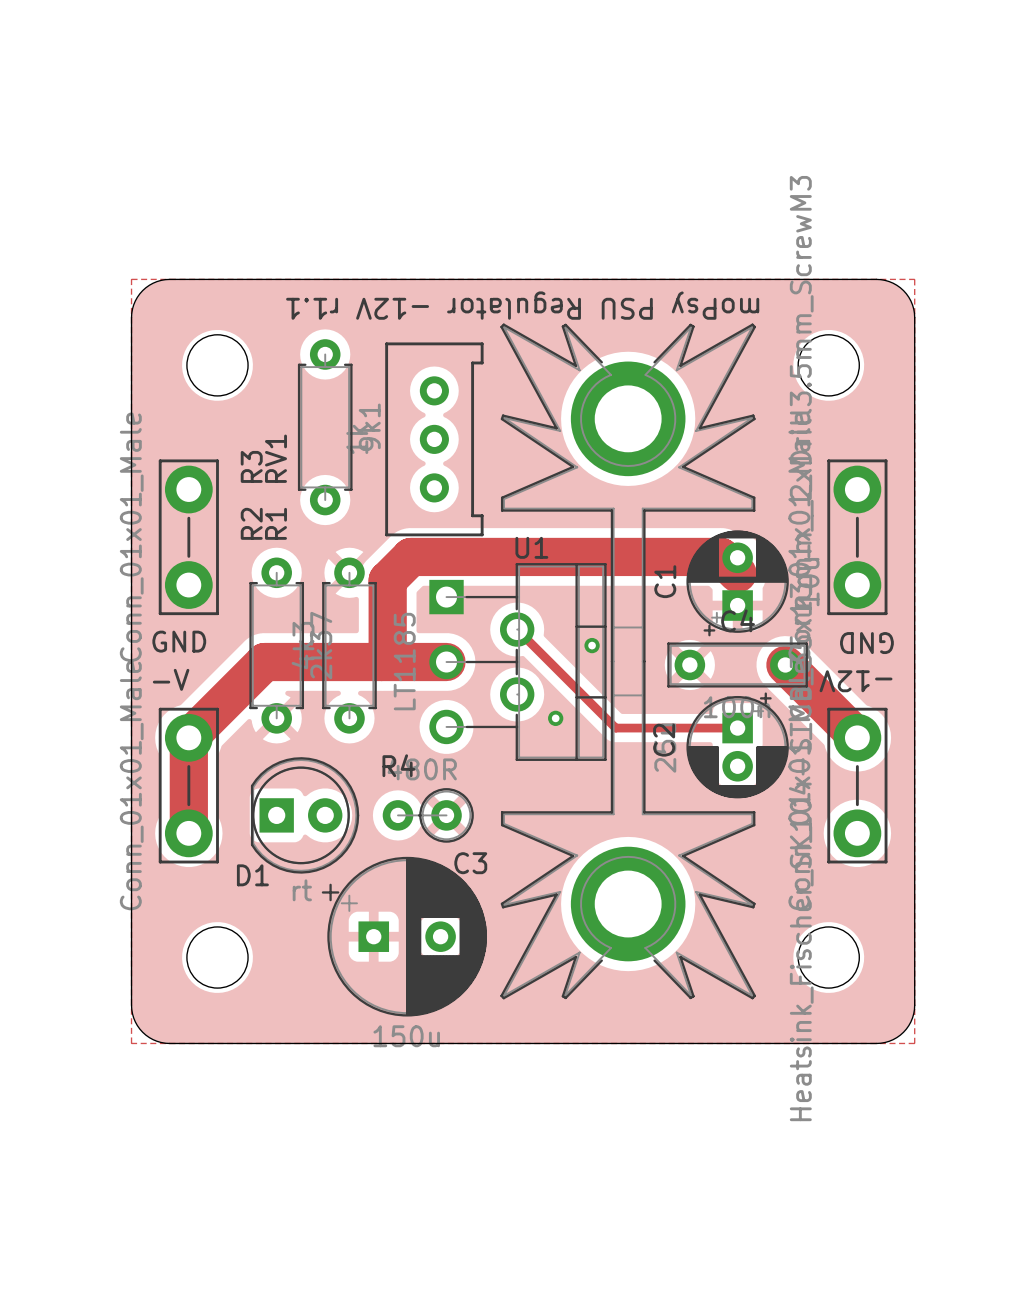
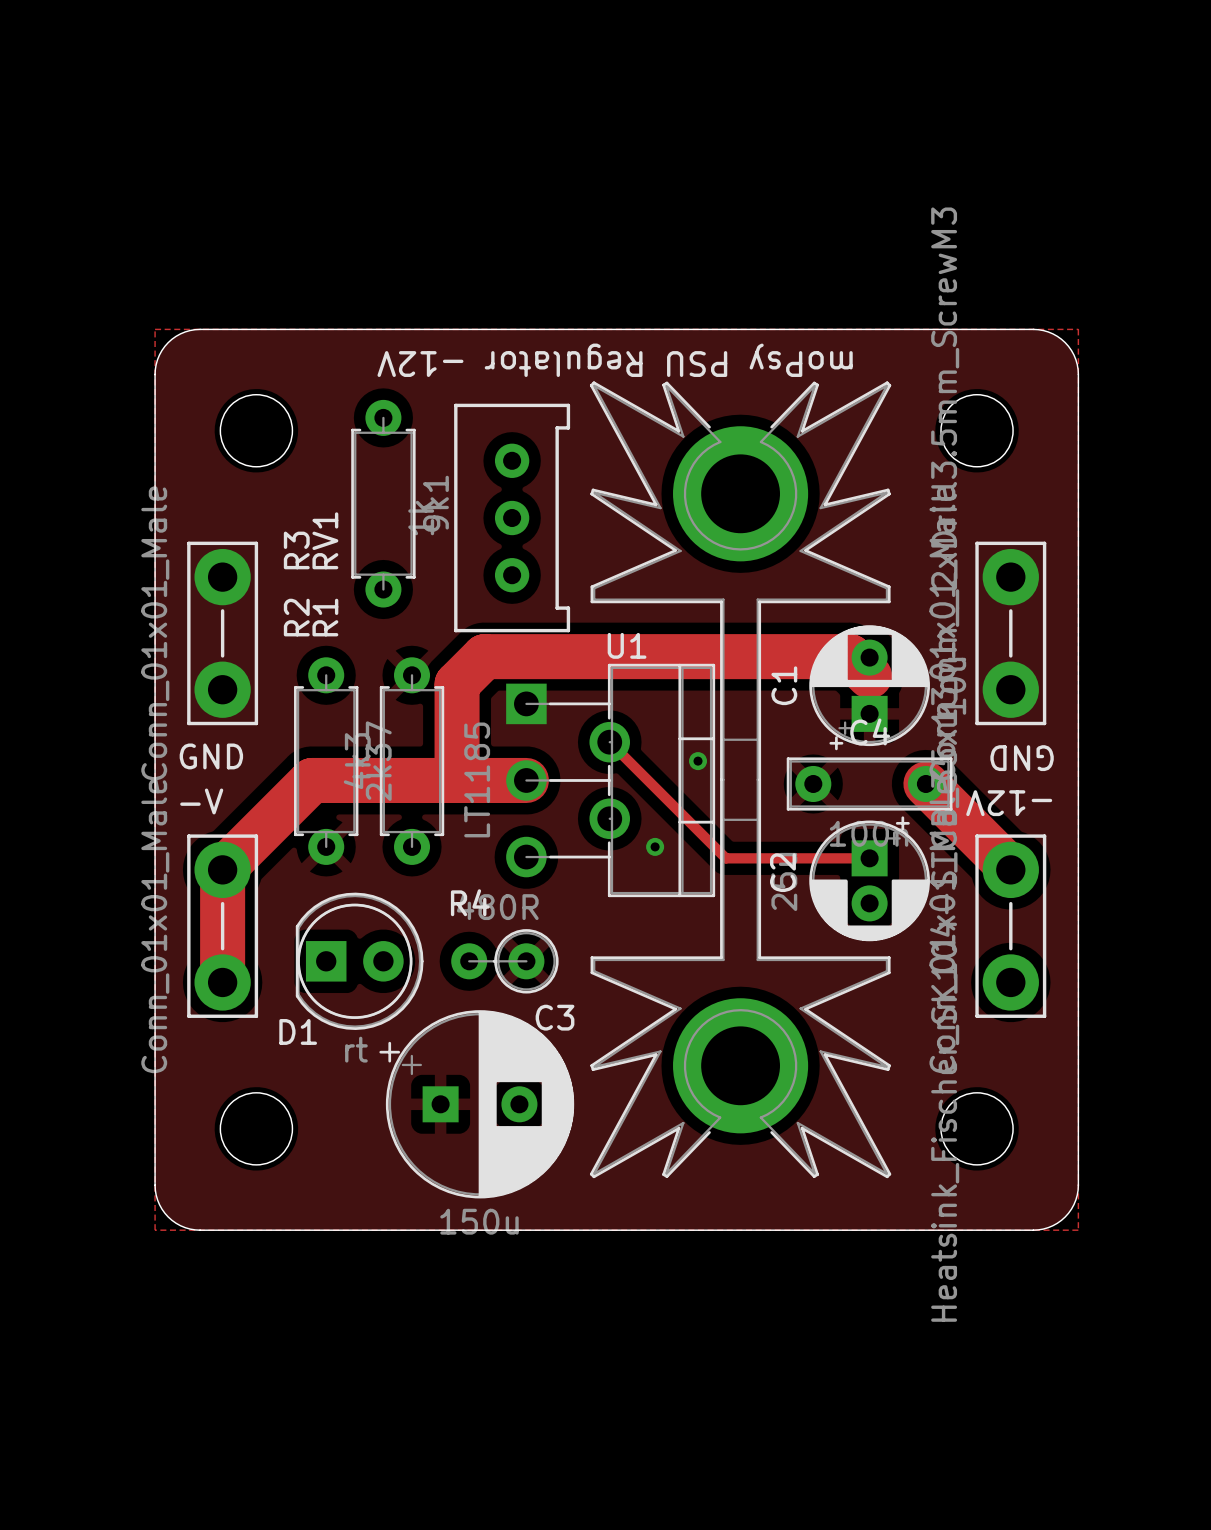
text: moPsy PSU Regulator -12V r1.1 (522, 305) -> moPsy PSU Regulator -12V (615, 360)

